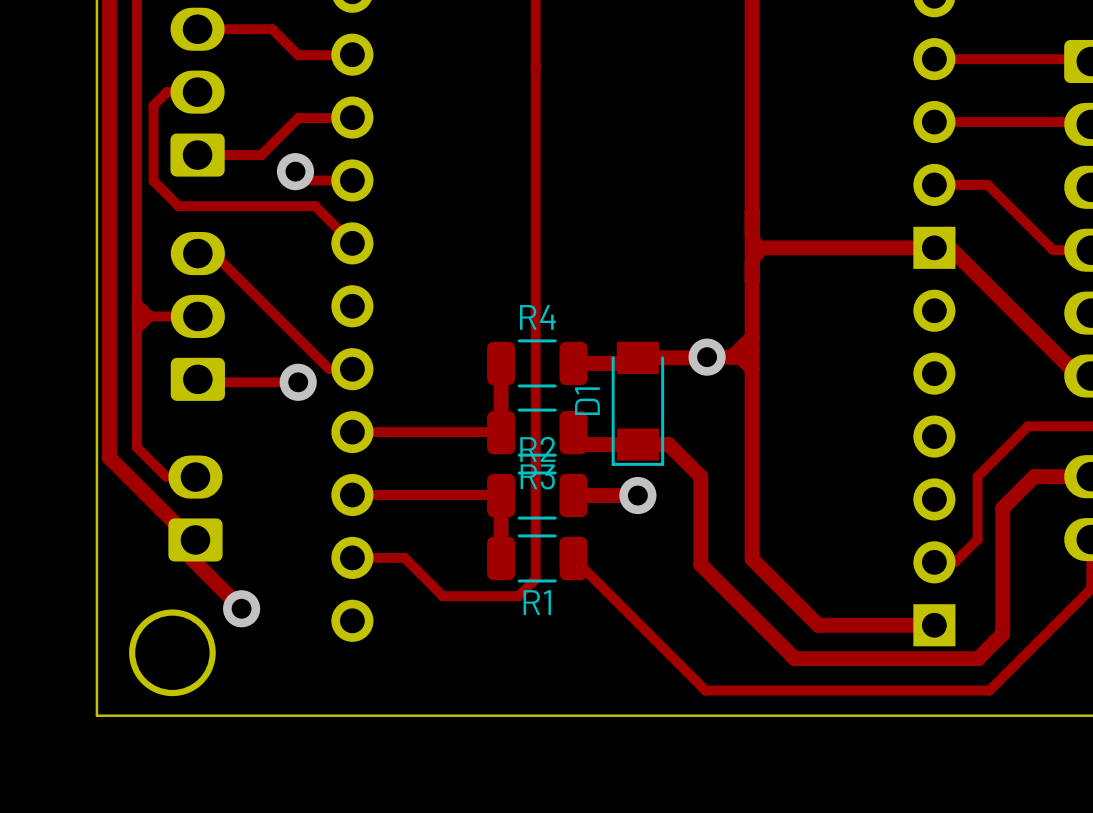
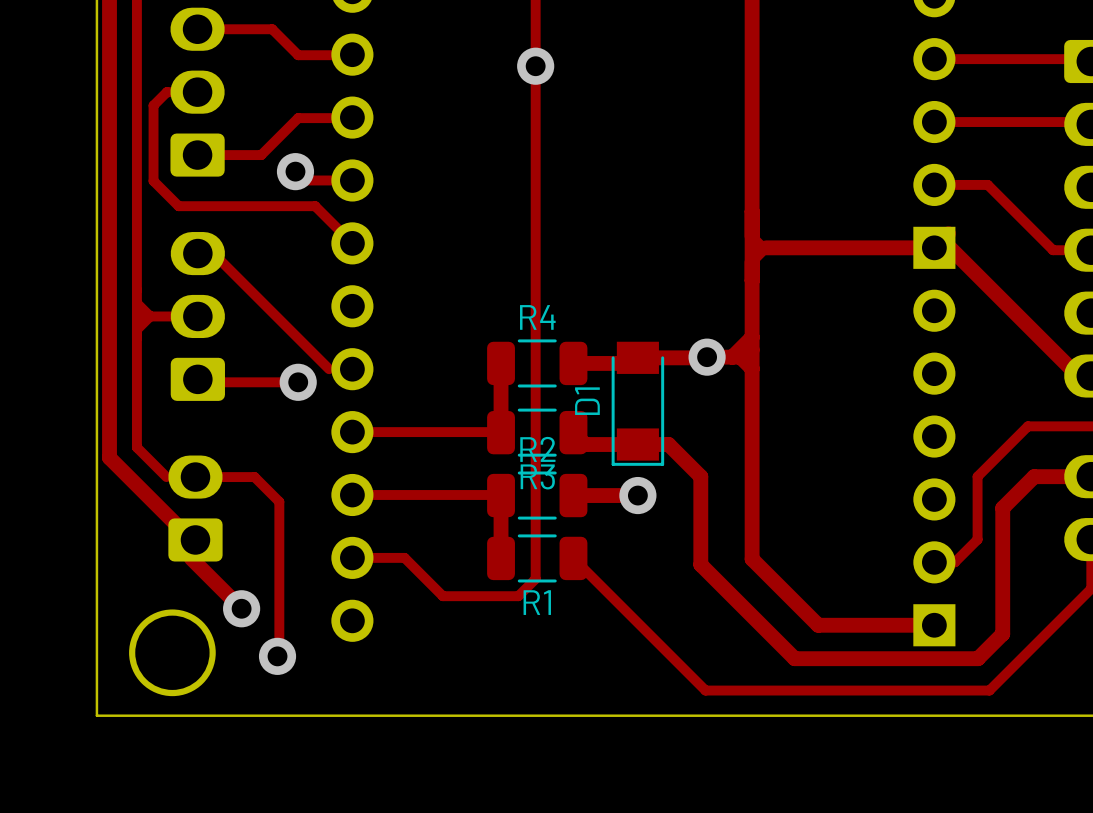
via: none -> (535, 66)
track: none -> (195, 477) (254, 477) (279, 501) (279, 654) (277, 656)
via: none -> (277, 656)

